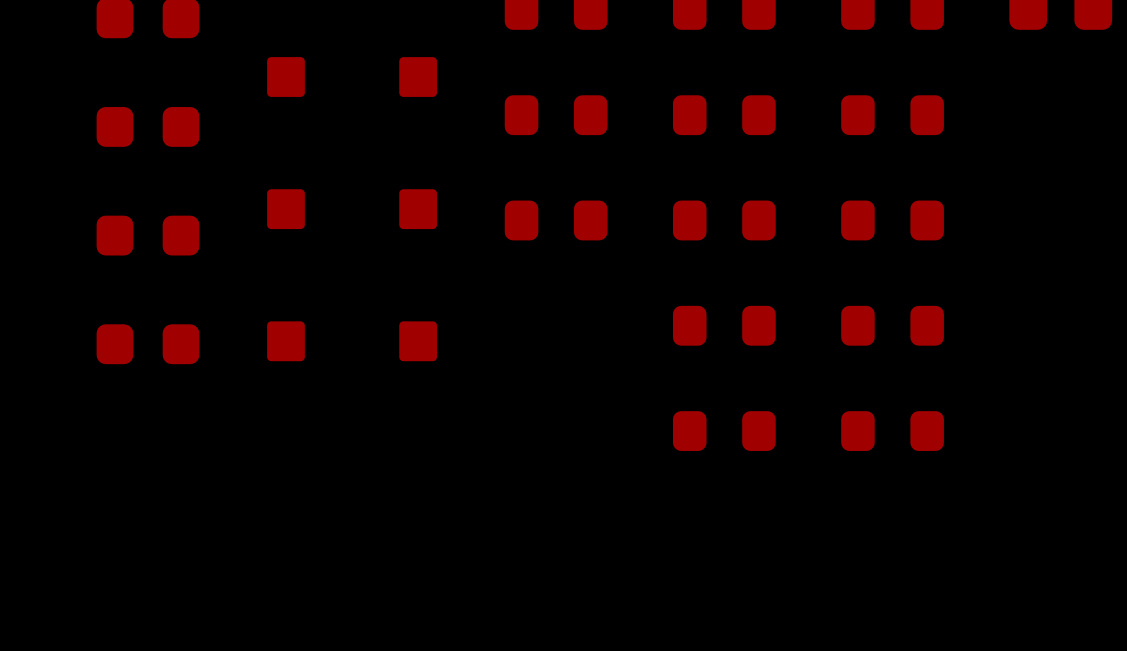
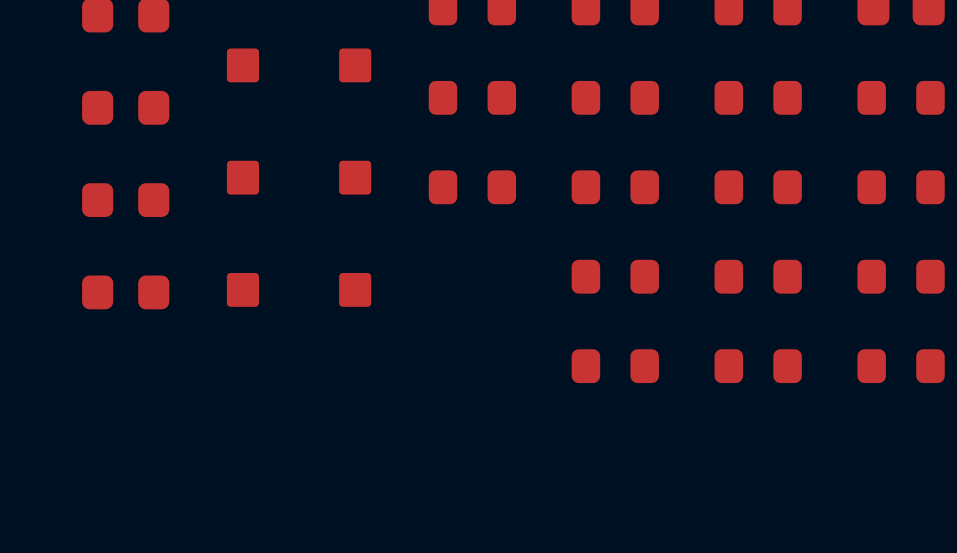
part: none -> (901, 97)
part: none -> (901, 187)
part: none -> (901, 276)
part: none -> (901, 366)

